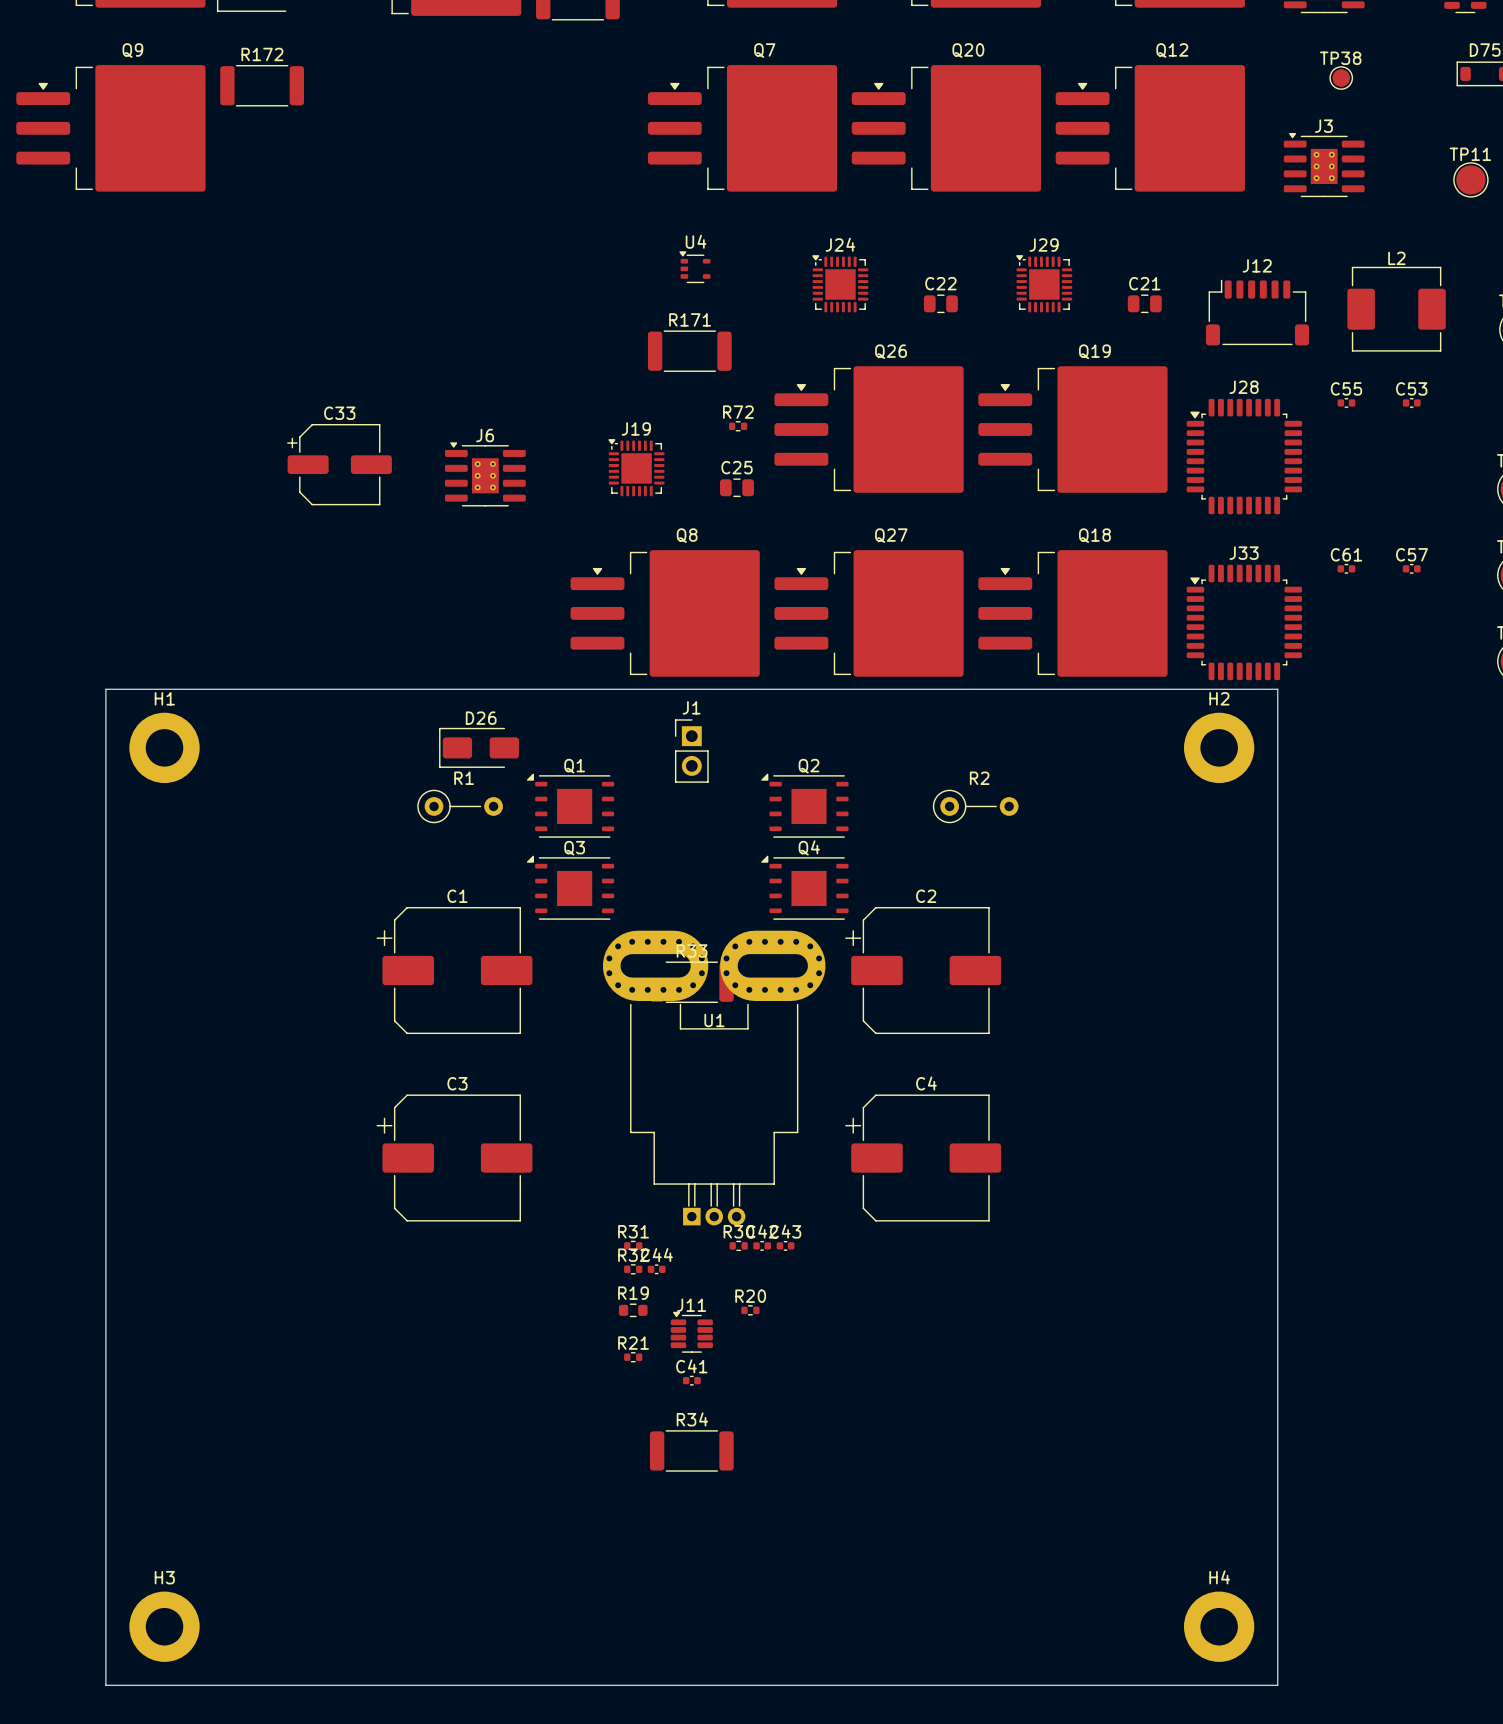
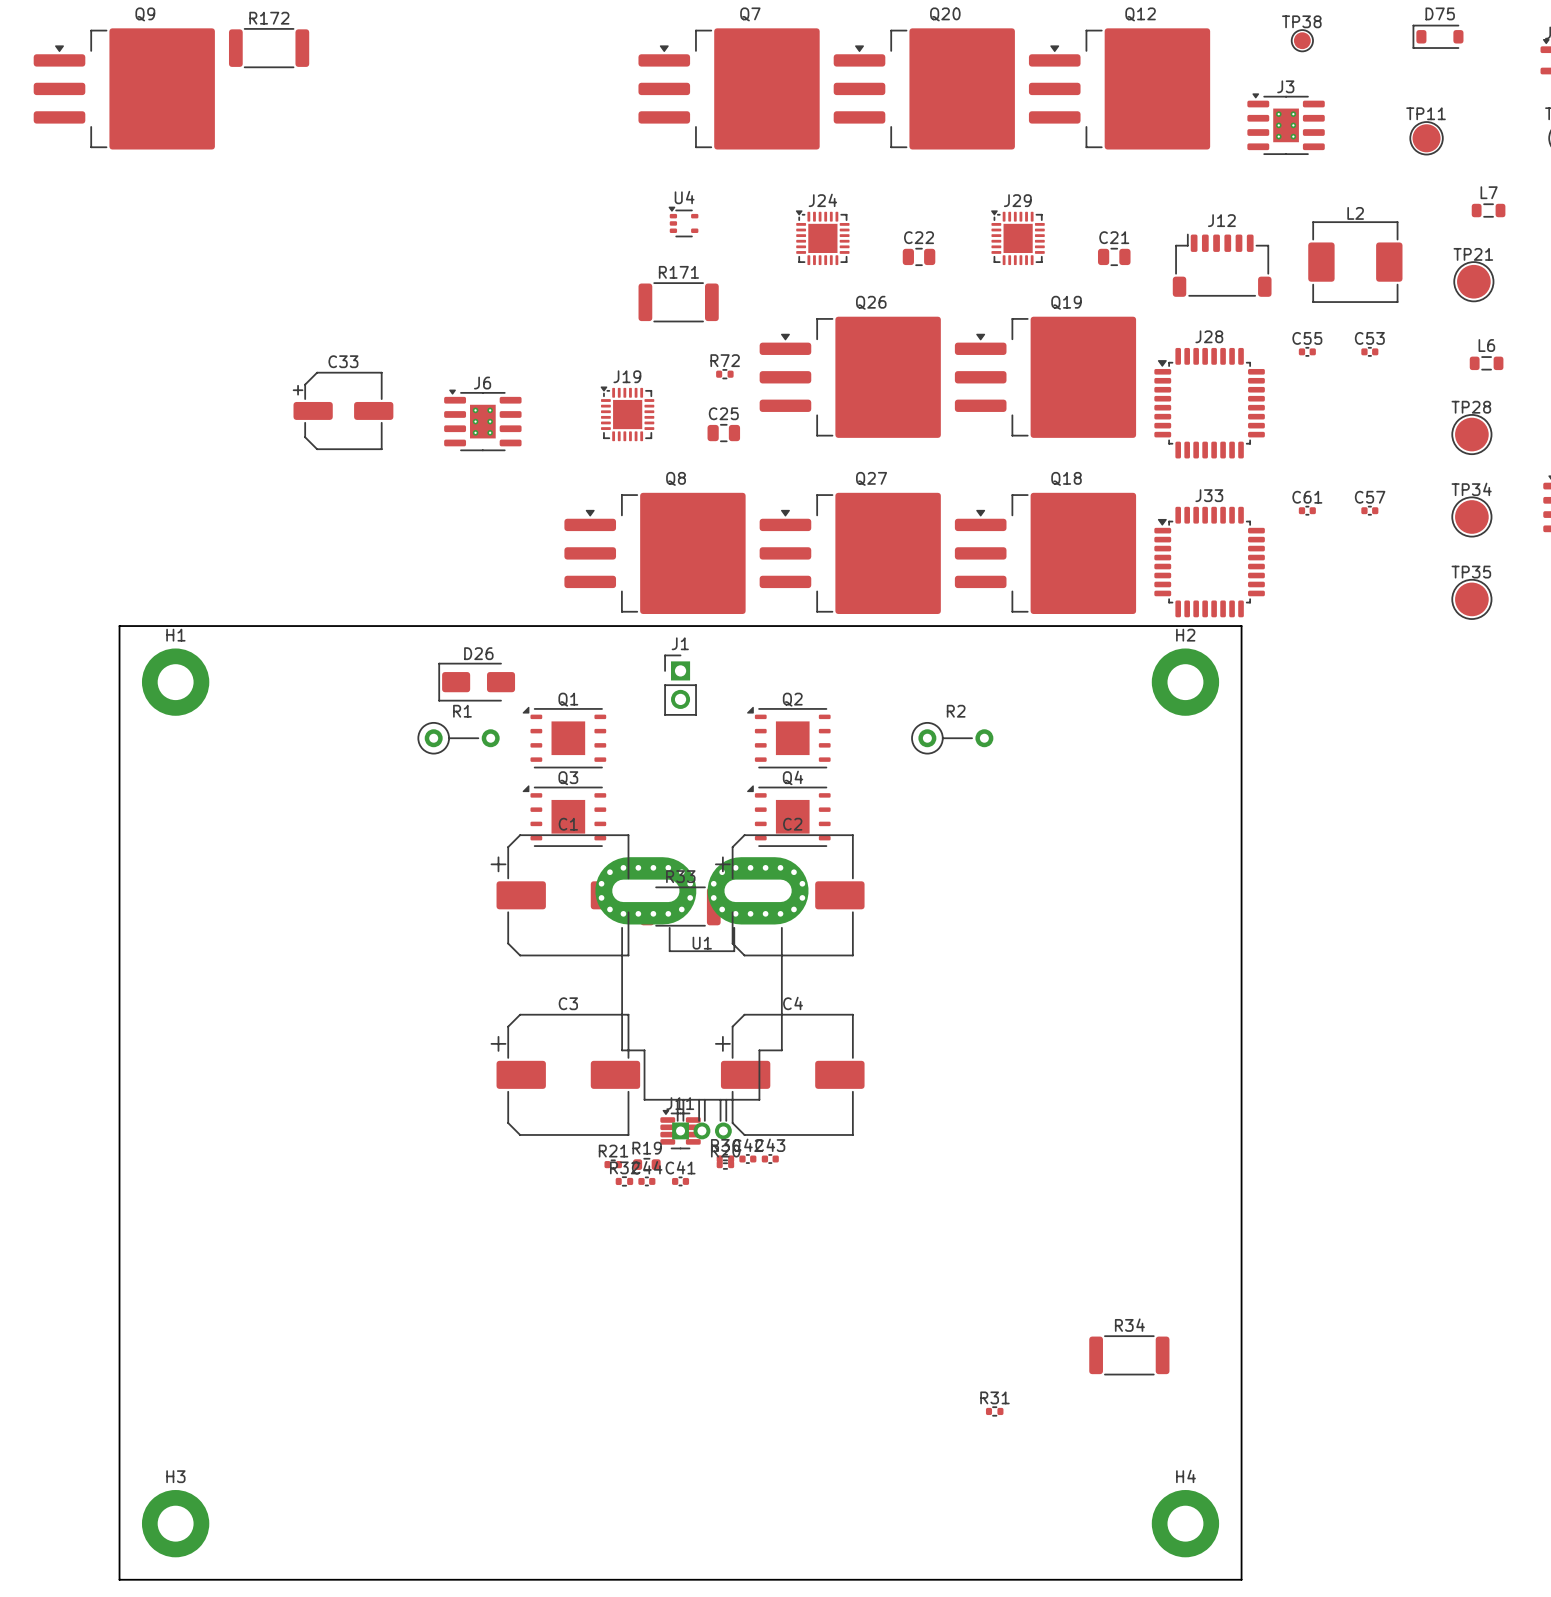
C1 position: (454, 970) -> (565, 895)
C2 position: (923, 970) -> (789, 895)
C3 position: (454, 1158) -> (565, 1074)
C4 position: (923, 1158) -> (789, 1074)
R31 position: (633, 1245) -> (994, 1411)
R19 position: (633, 1310) -> (646, 1164)
R20 position: (750, 1310) -> (725, 1164)
J11 position: (691, 1332) -> (680, 1129)
R21 position: (633, 1357) -> (613, 1164)
C41 position: (691, 1380) -> (680, 1181)
R34 position: (691, 1450) -> (1129, 1355)

